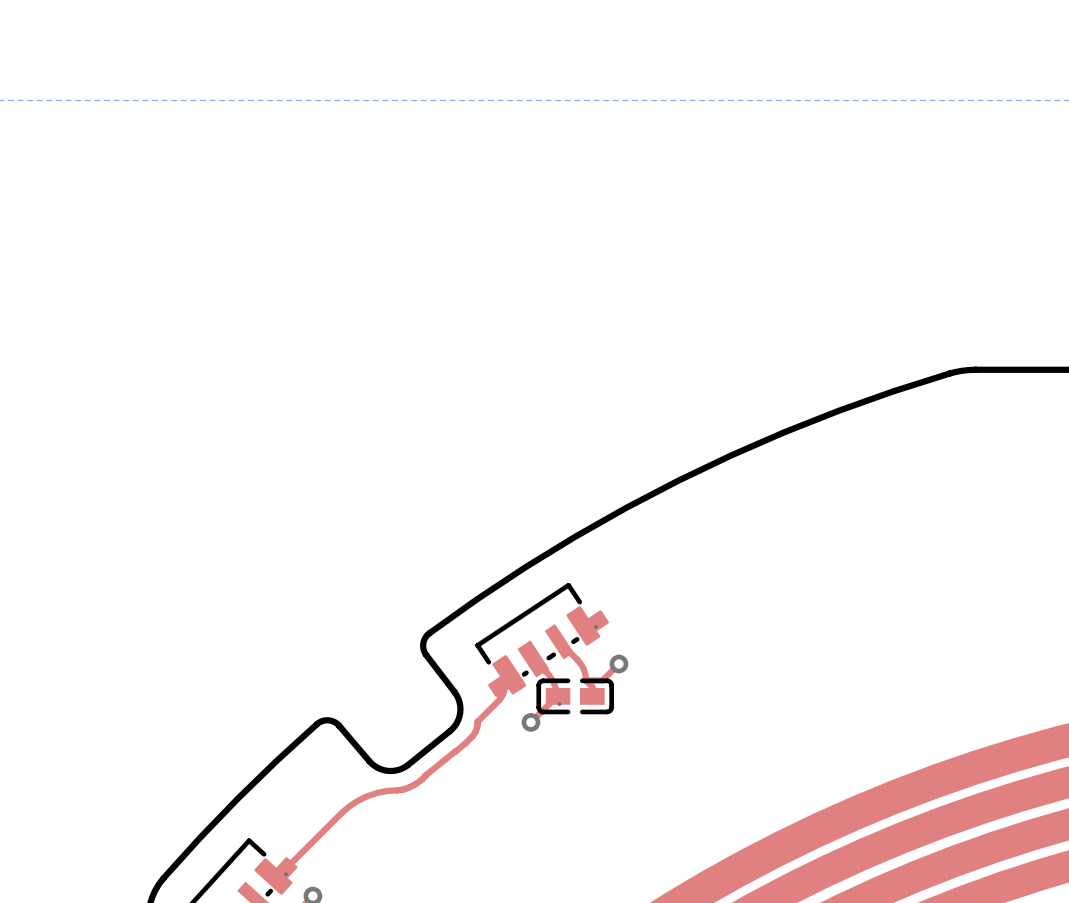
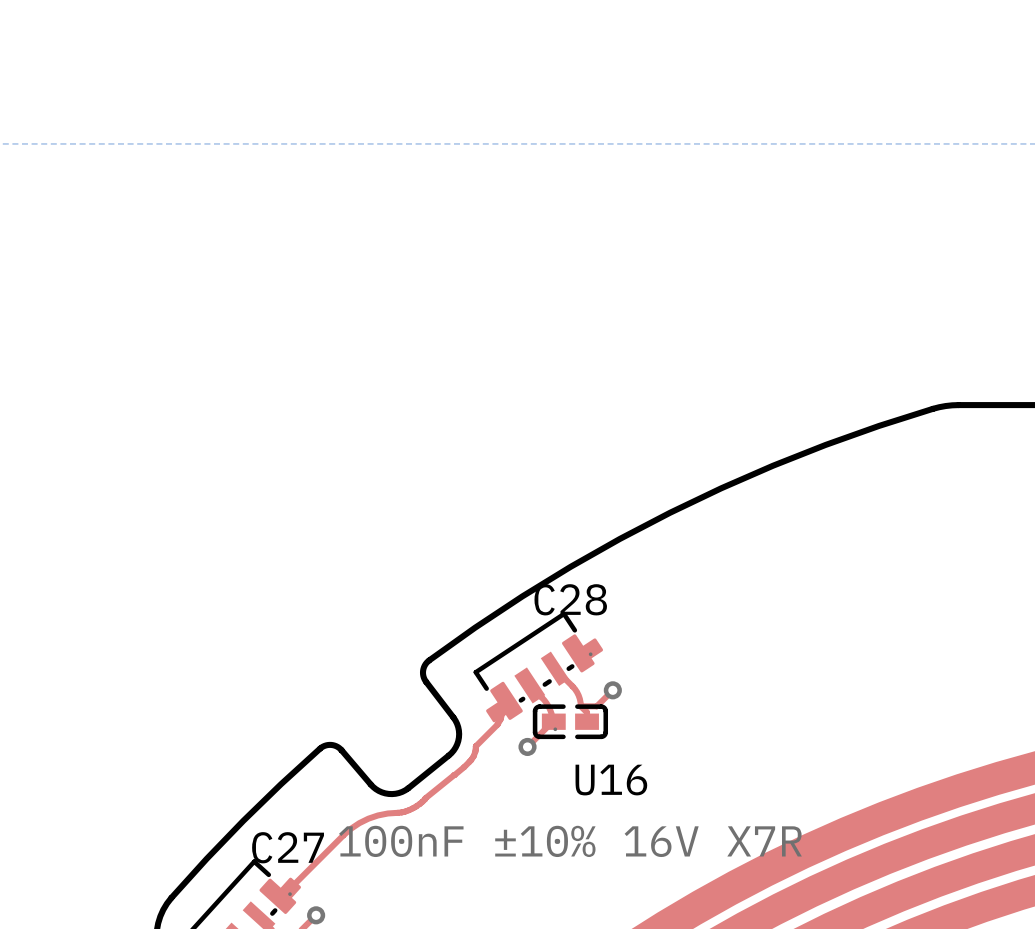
C28 name: none -> C28 (570, 599)
U16 name: none -> U16 (611, 780)
C28 value: none -> 100nF ±10% 16V X7R (570, 841)
C27 name: none -> C27 (288, 847)

